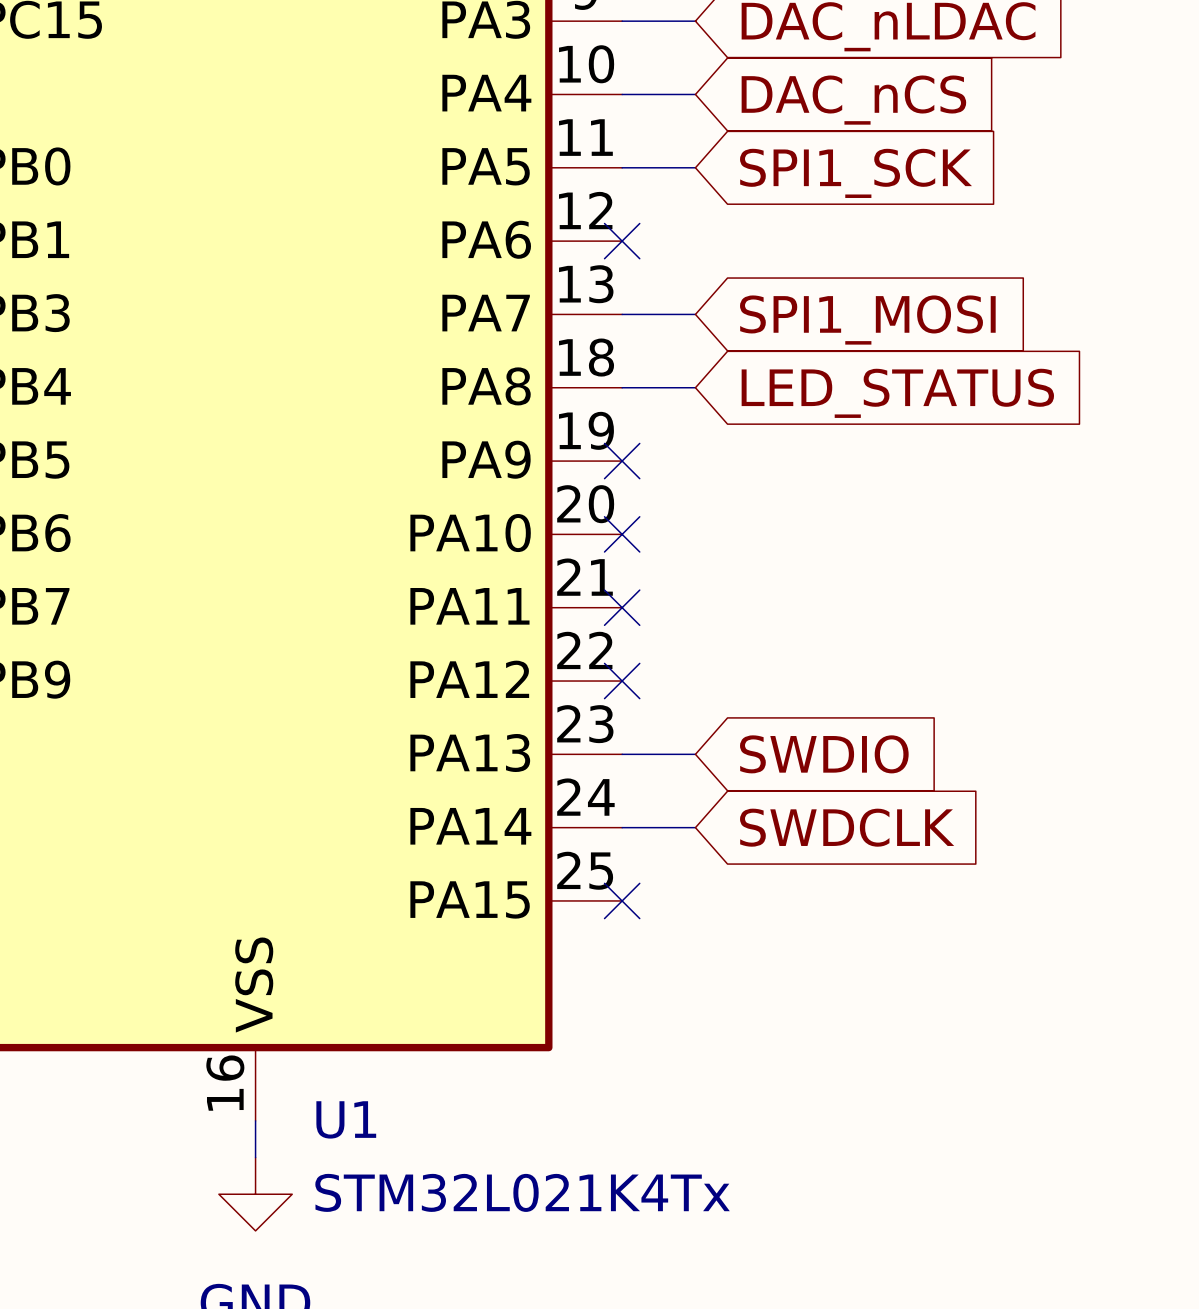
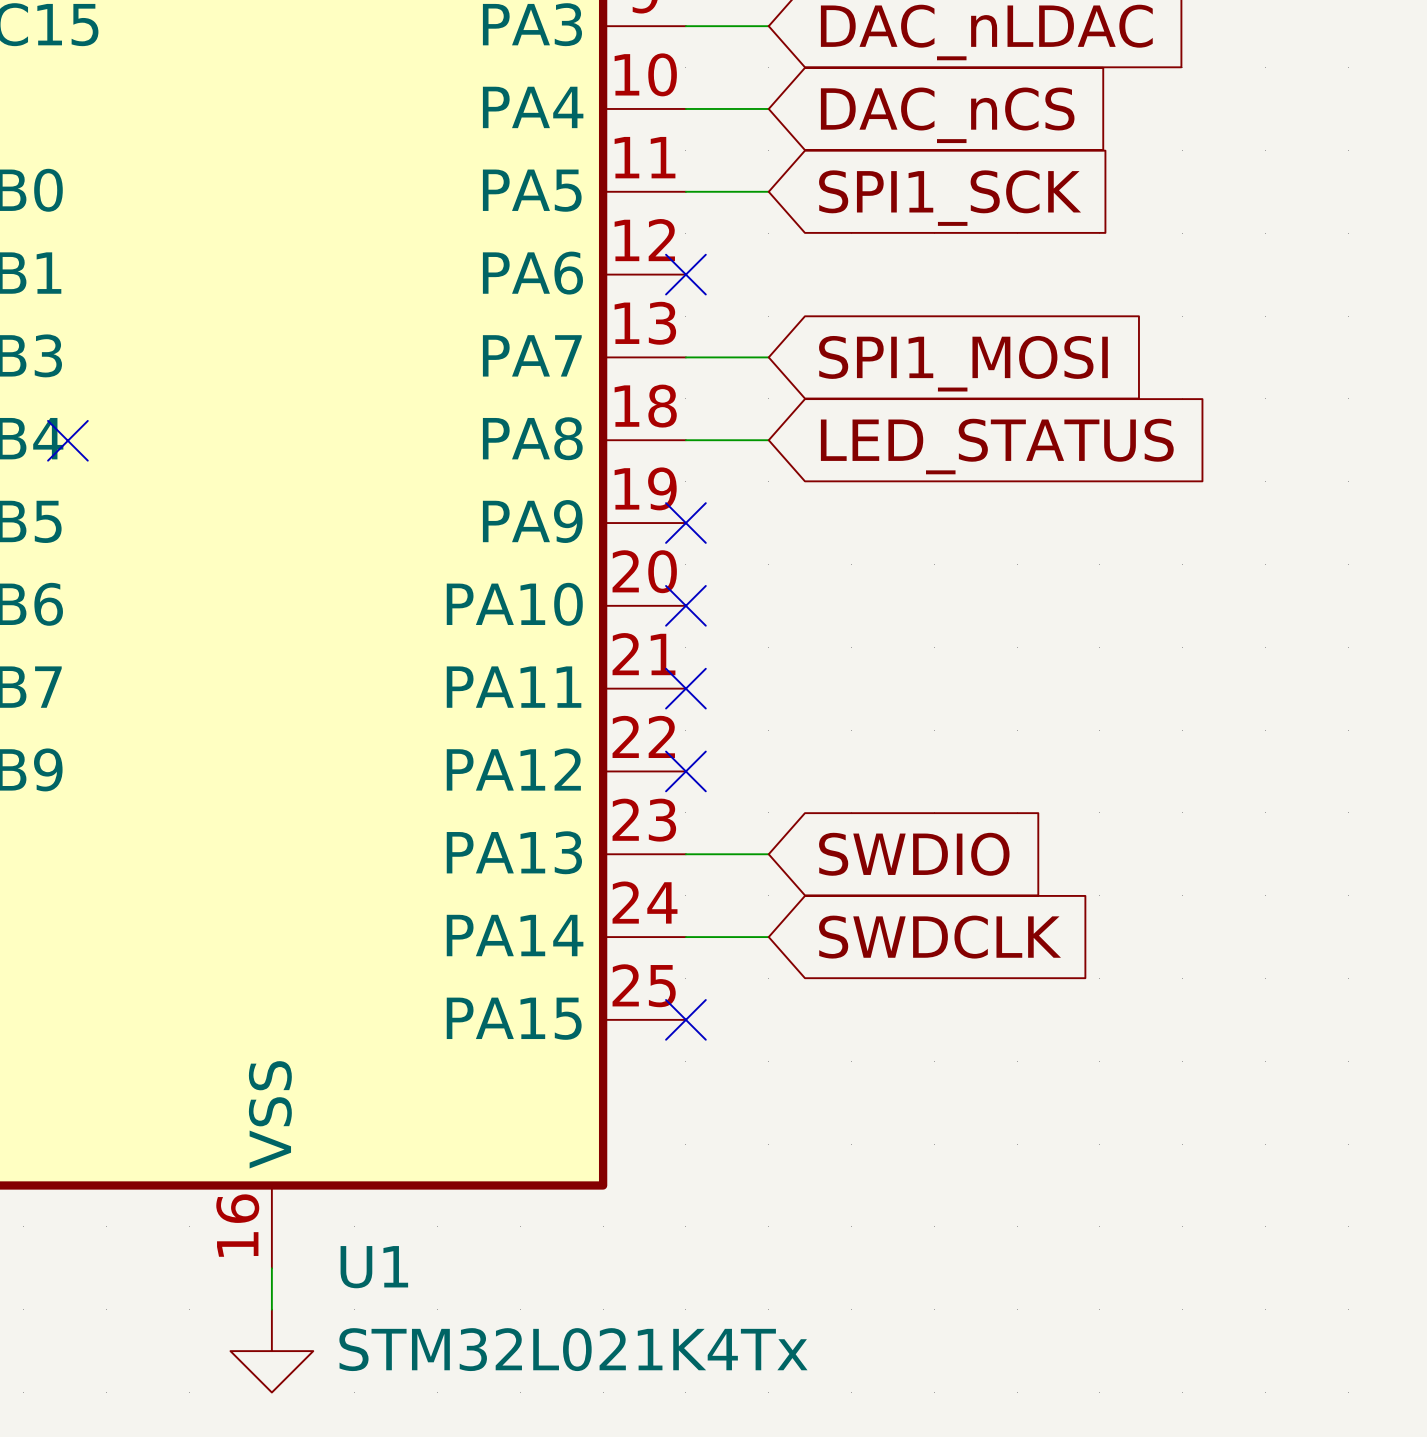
no-connect mark: none -> (67, 440)

